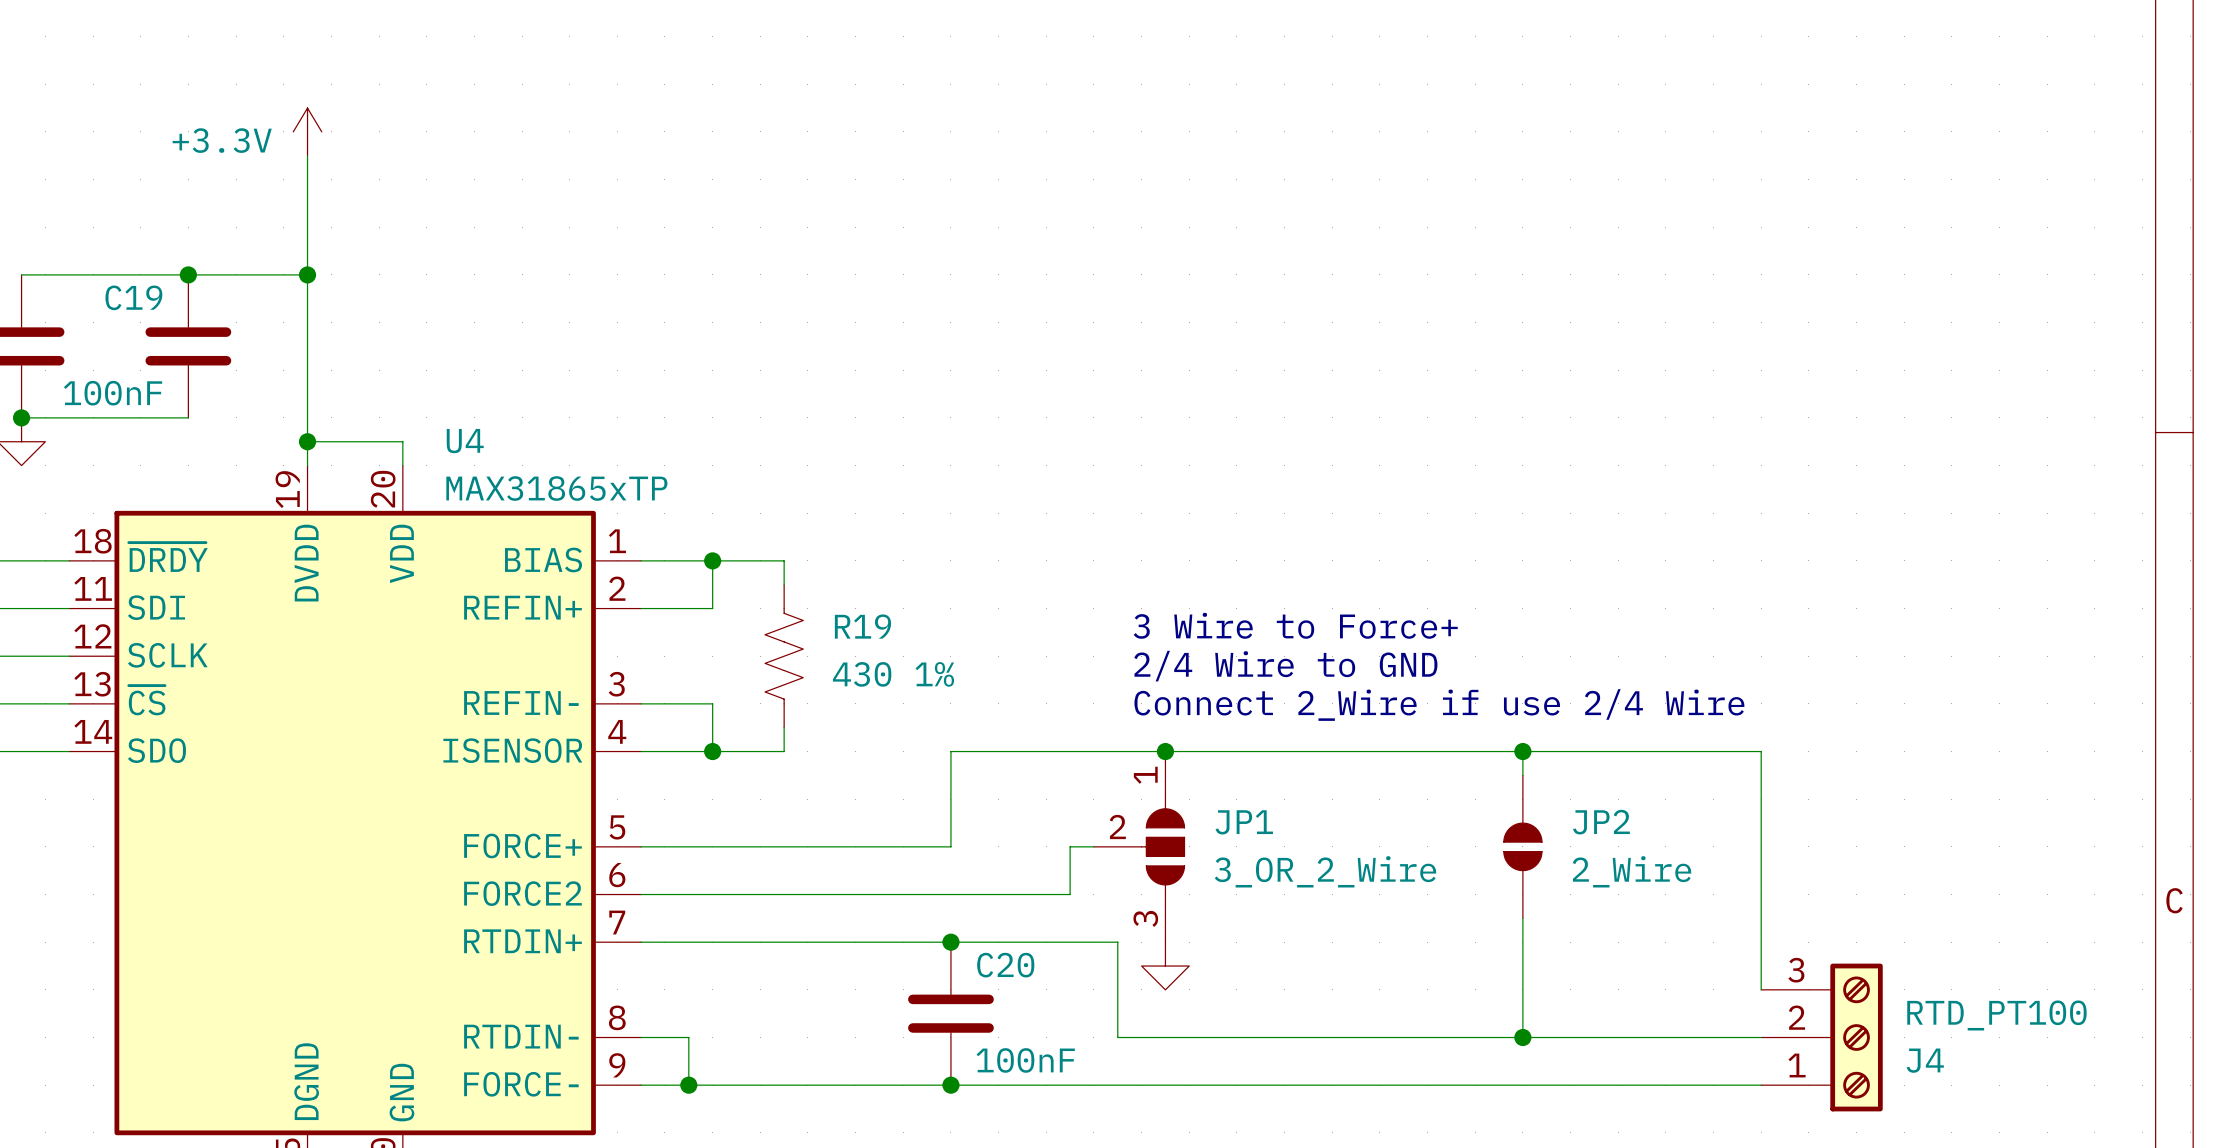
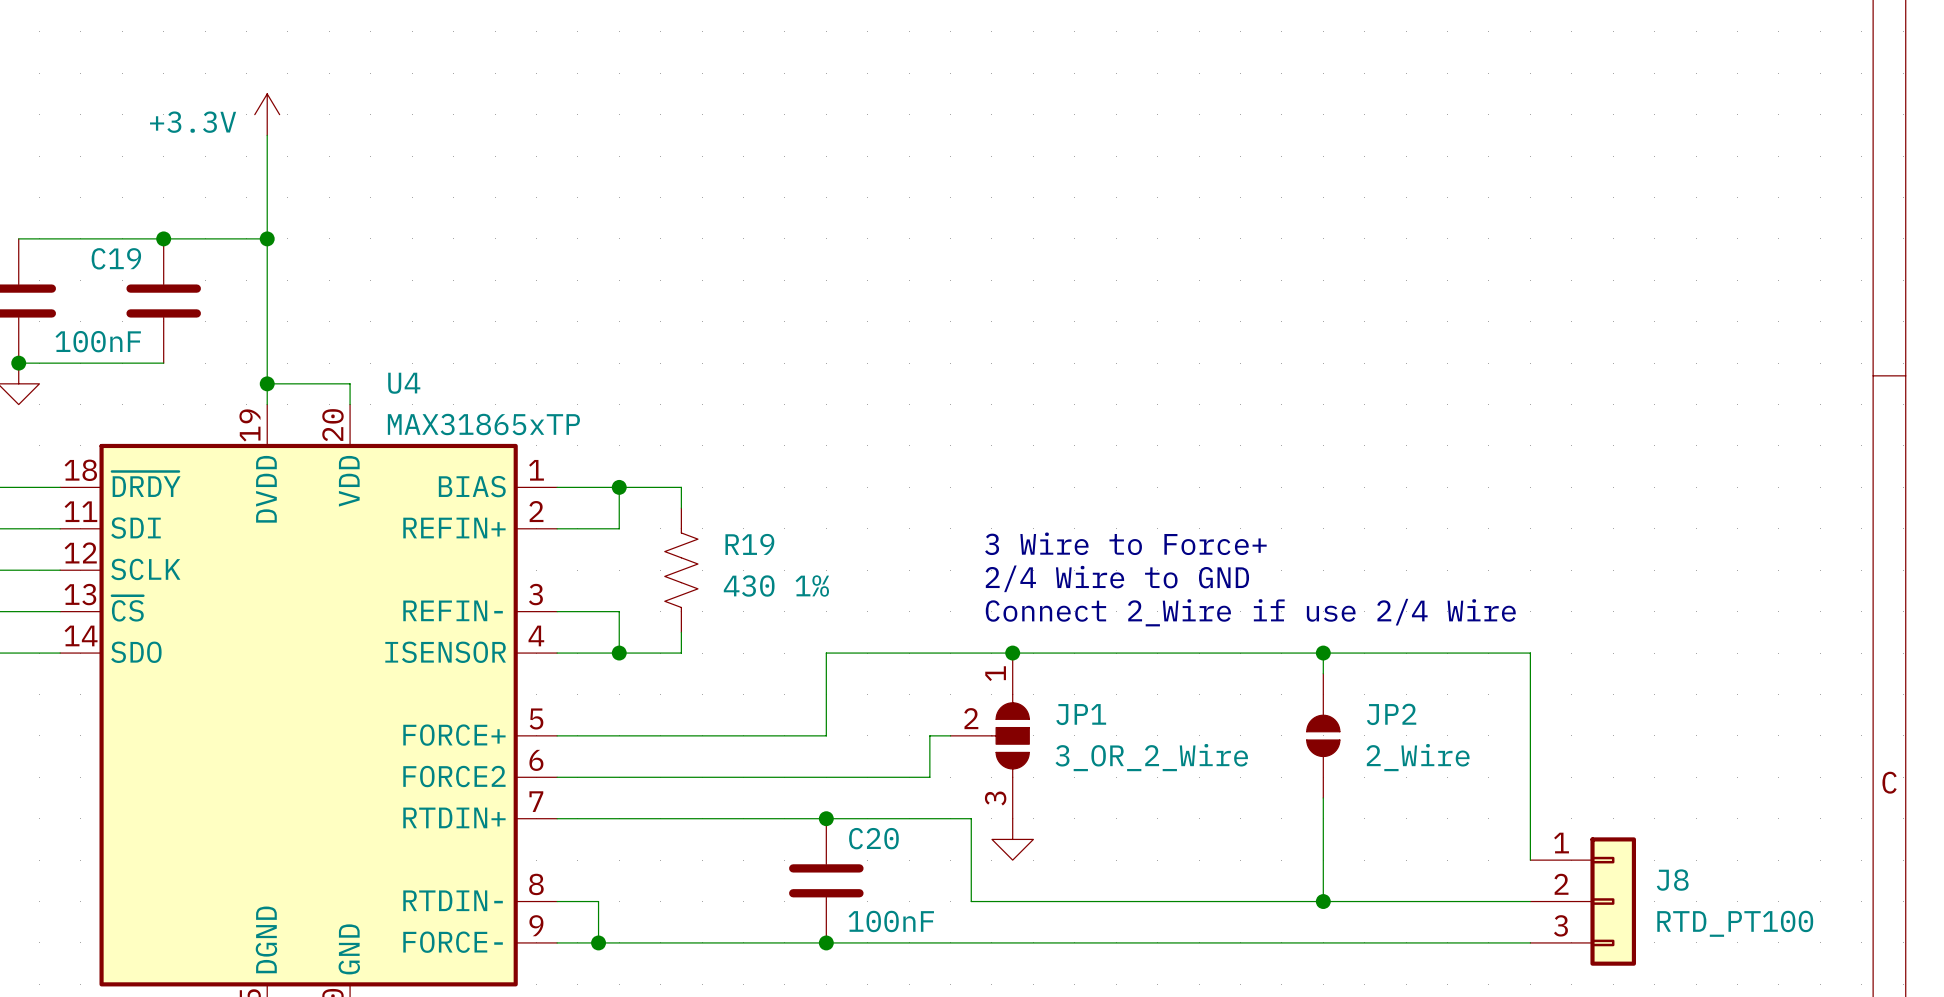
J4: RTD_PT100 (1821, 1037) -> none
J8: none -> RTD_PT100 (1583, 901)

